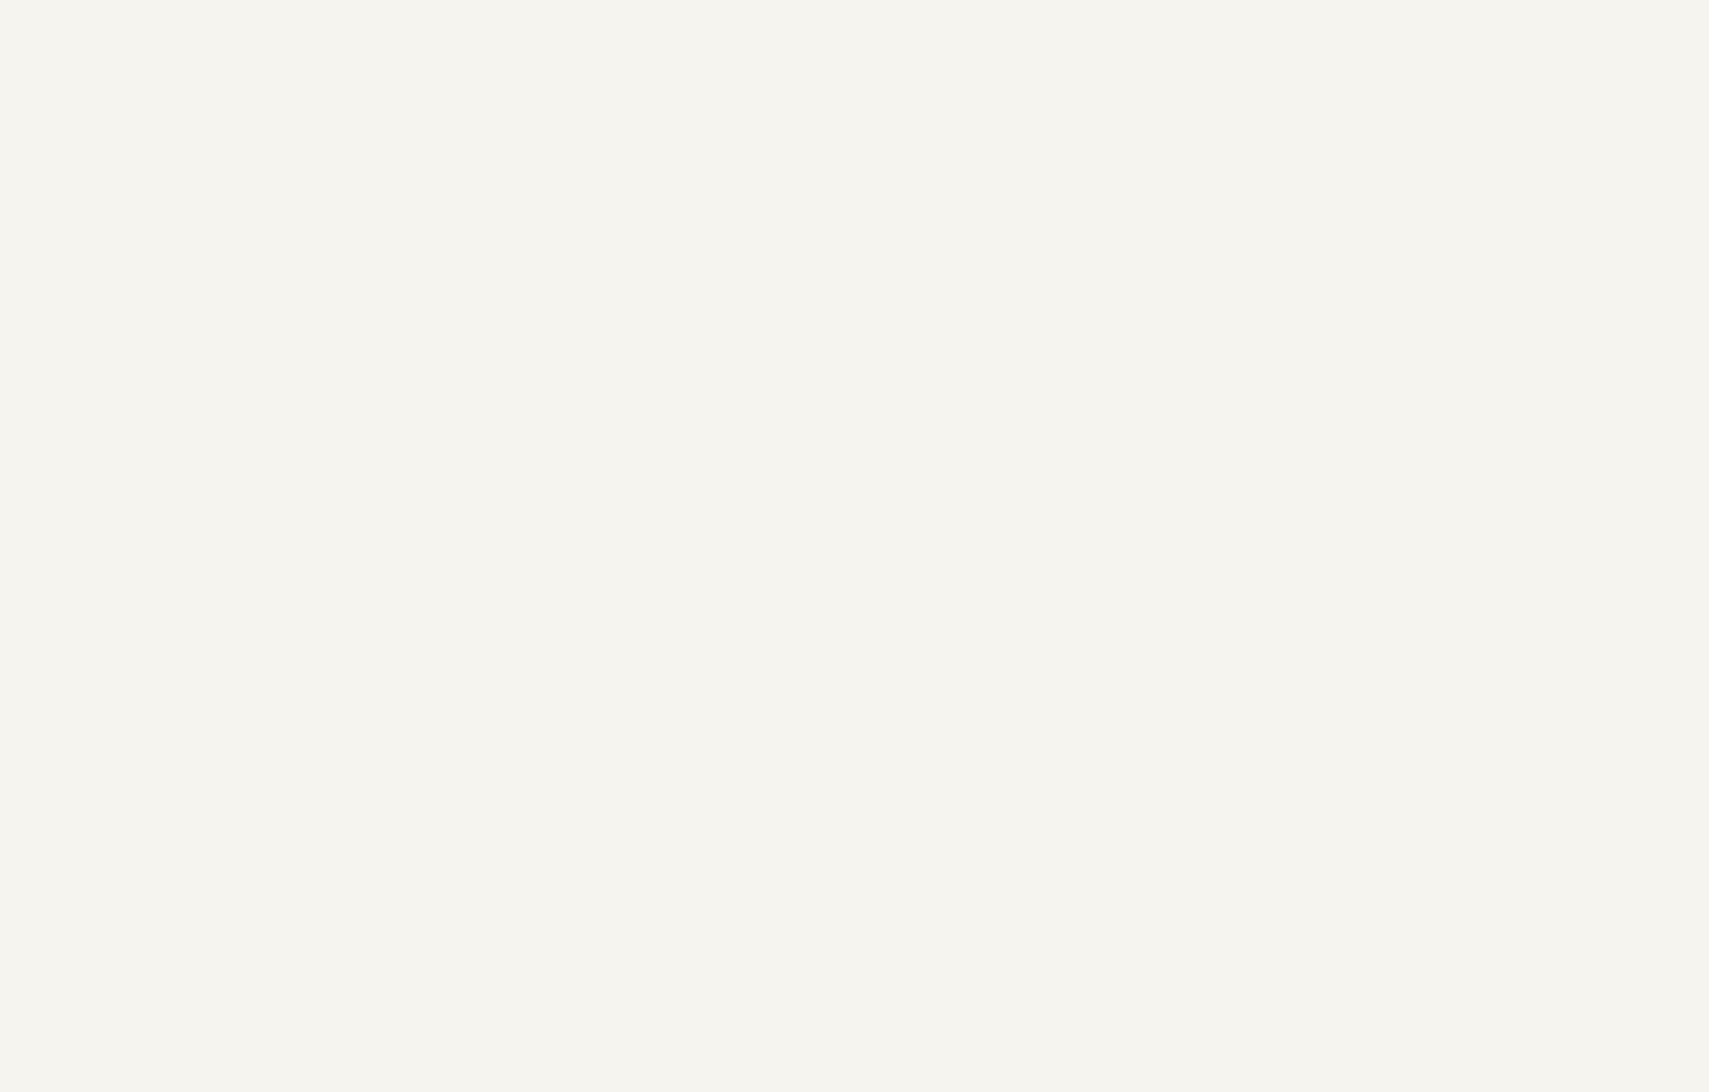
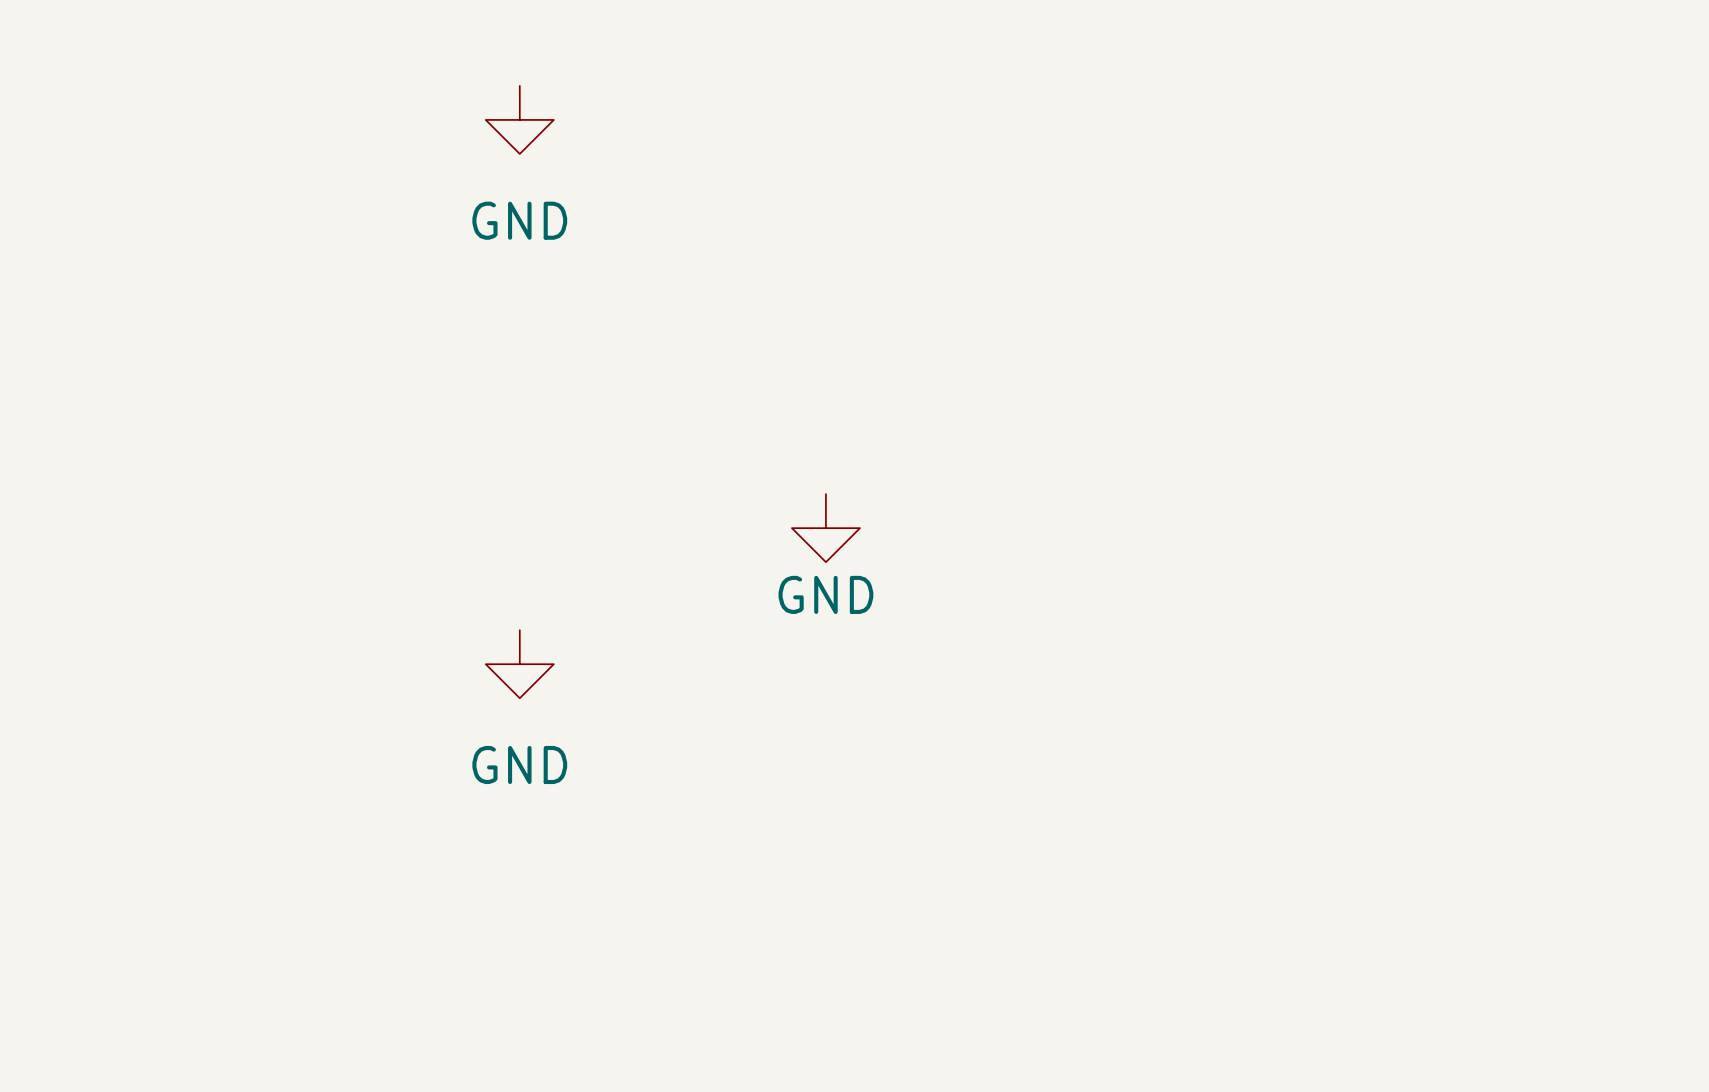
power symbol: none -> GND (519, 119)
power symbol: none -> GND (825, 528)
power symbol: none -> GND (519, 664)

